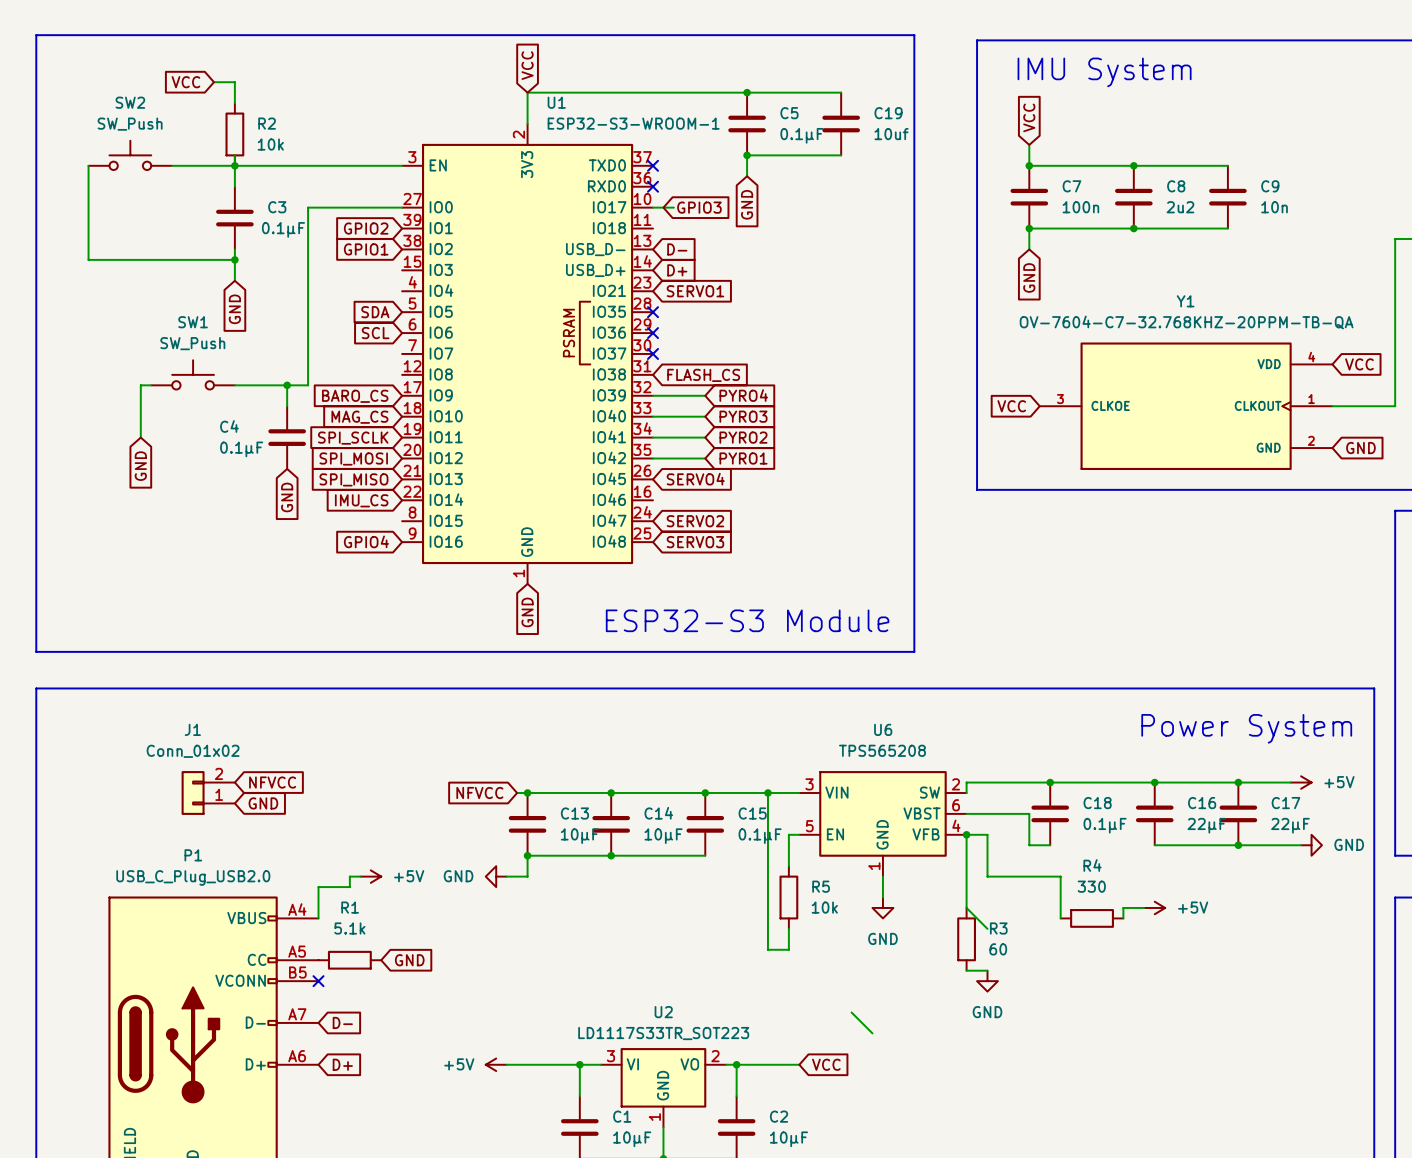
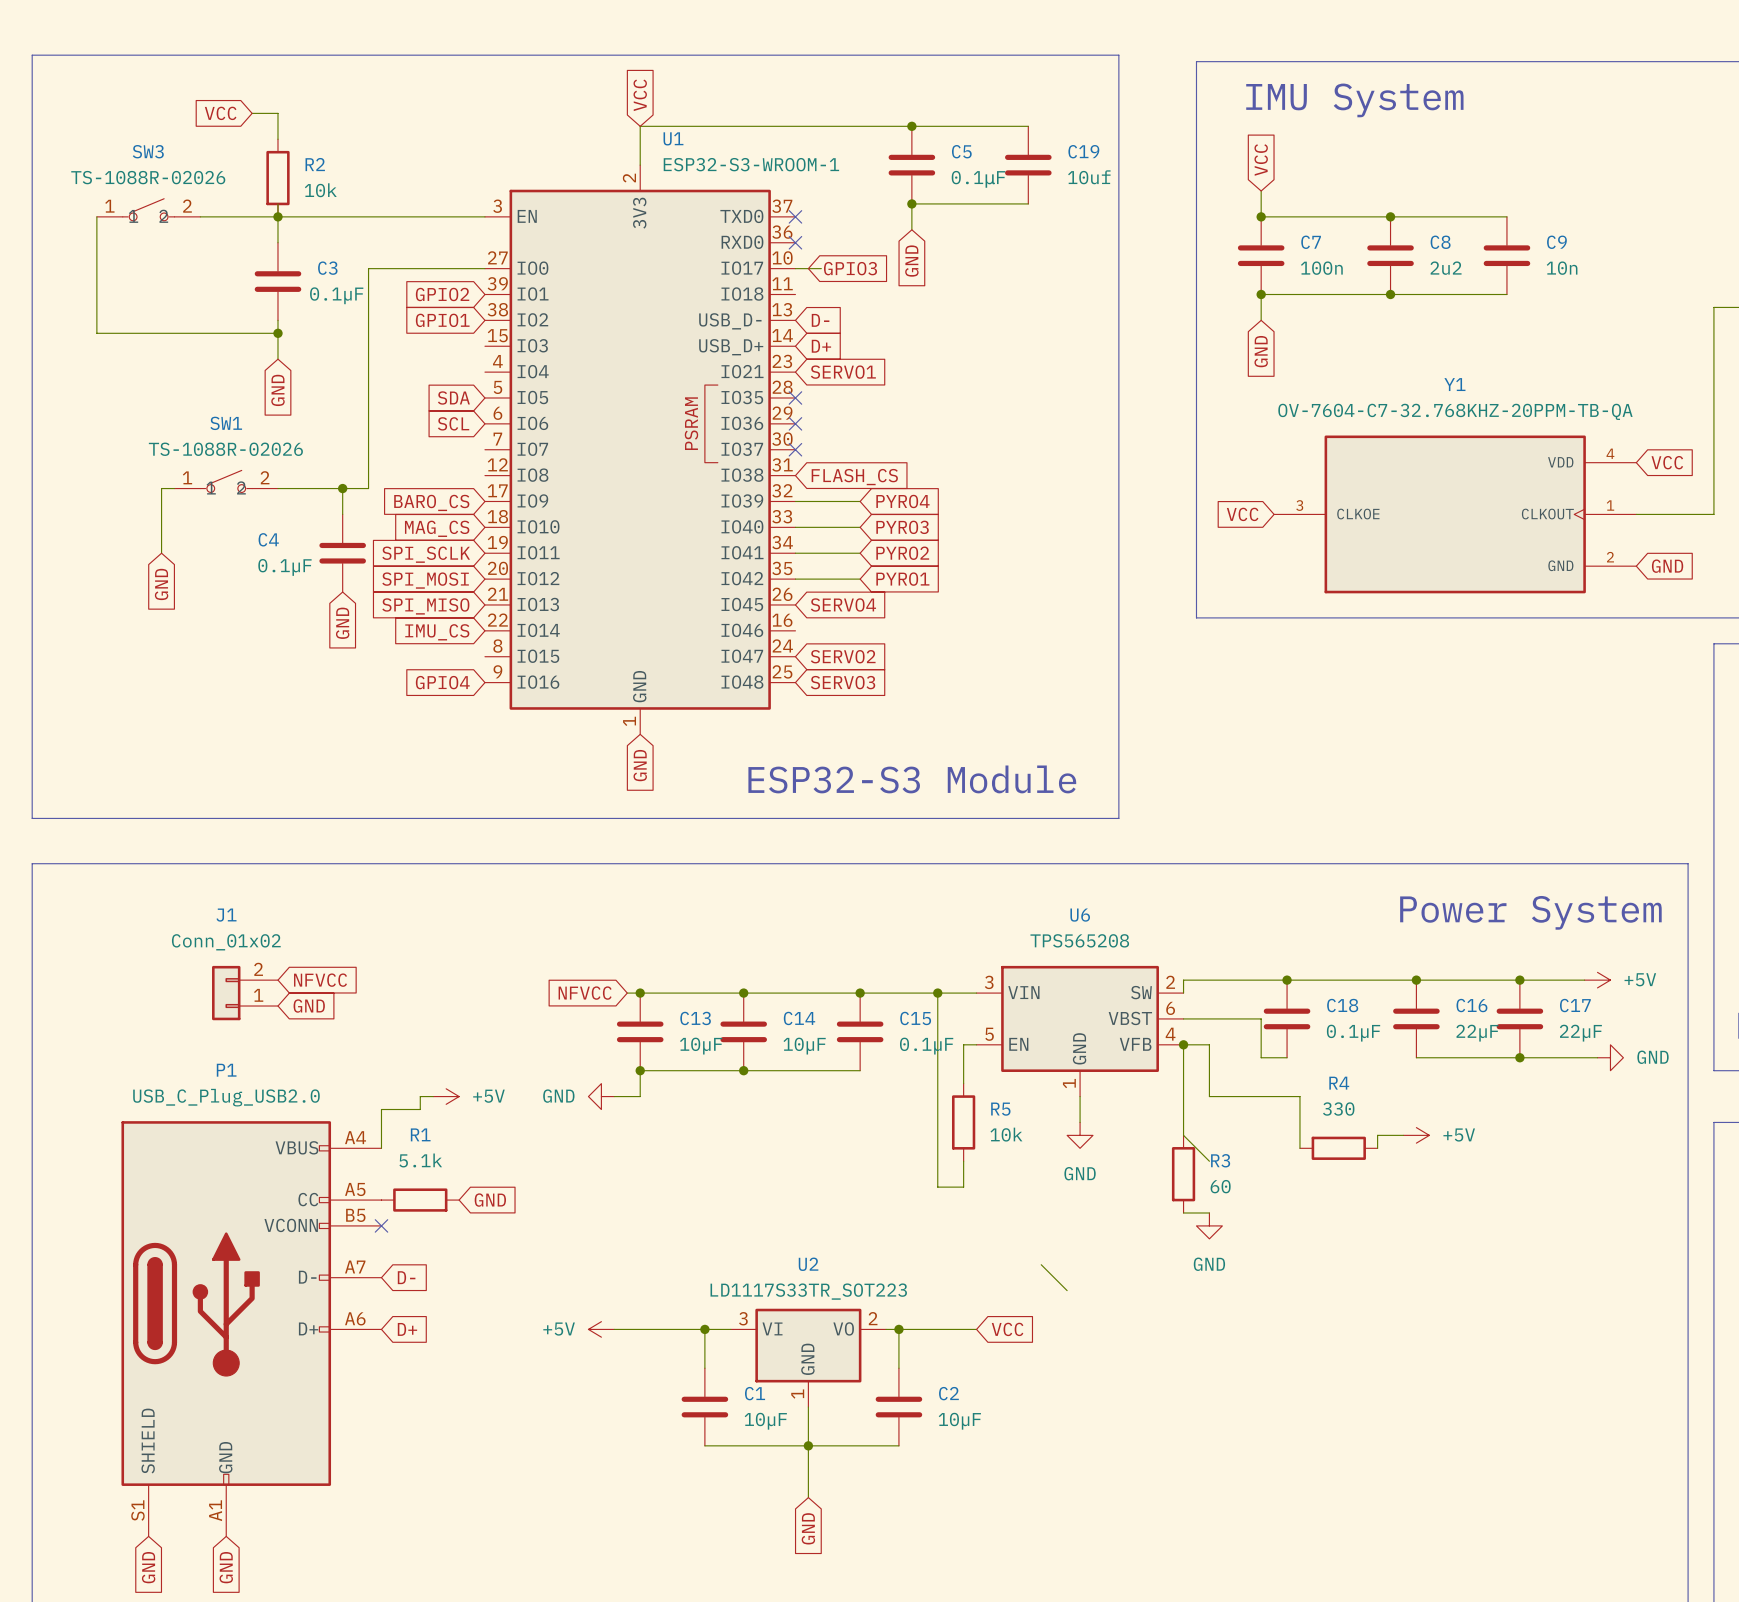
SW2: SW_Push (130, 155) -> none
SW3: none -> TS-1088R-02026 (148, 209)
SW1 value: SW_Push (192, 343) -> TS-1088R-02026 (225, 449)
SW1 symbol: [151, 360, 235, 390] -> [174, 470, 278, 493]

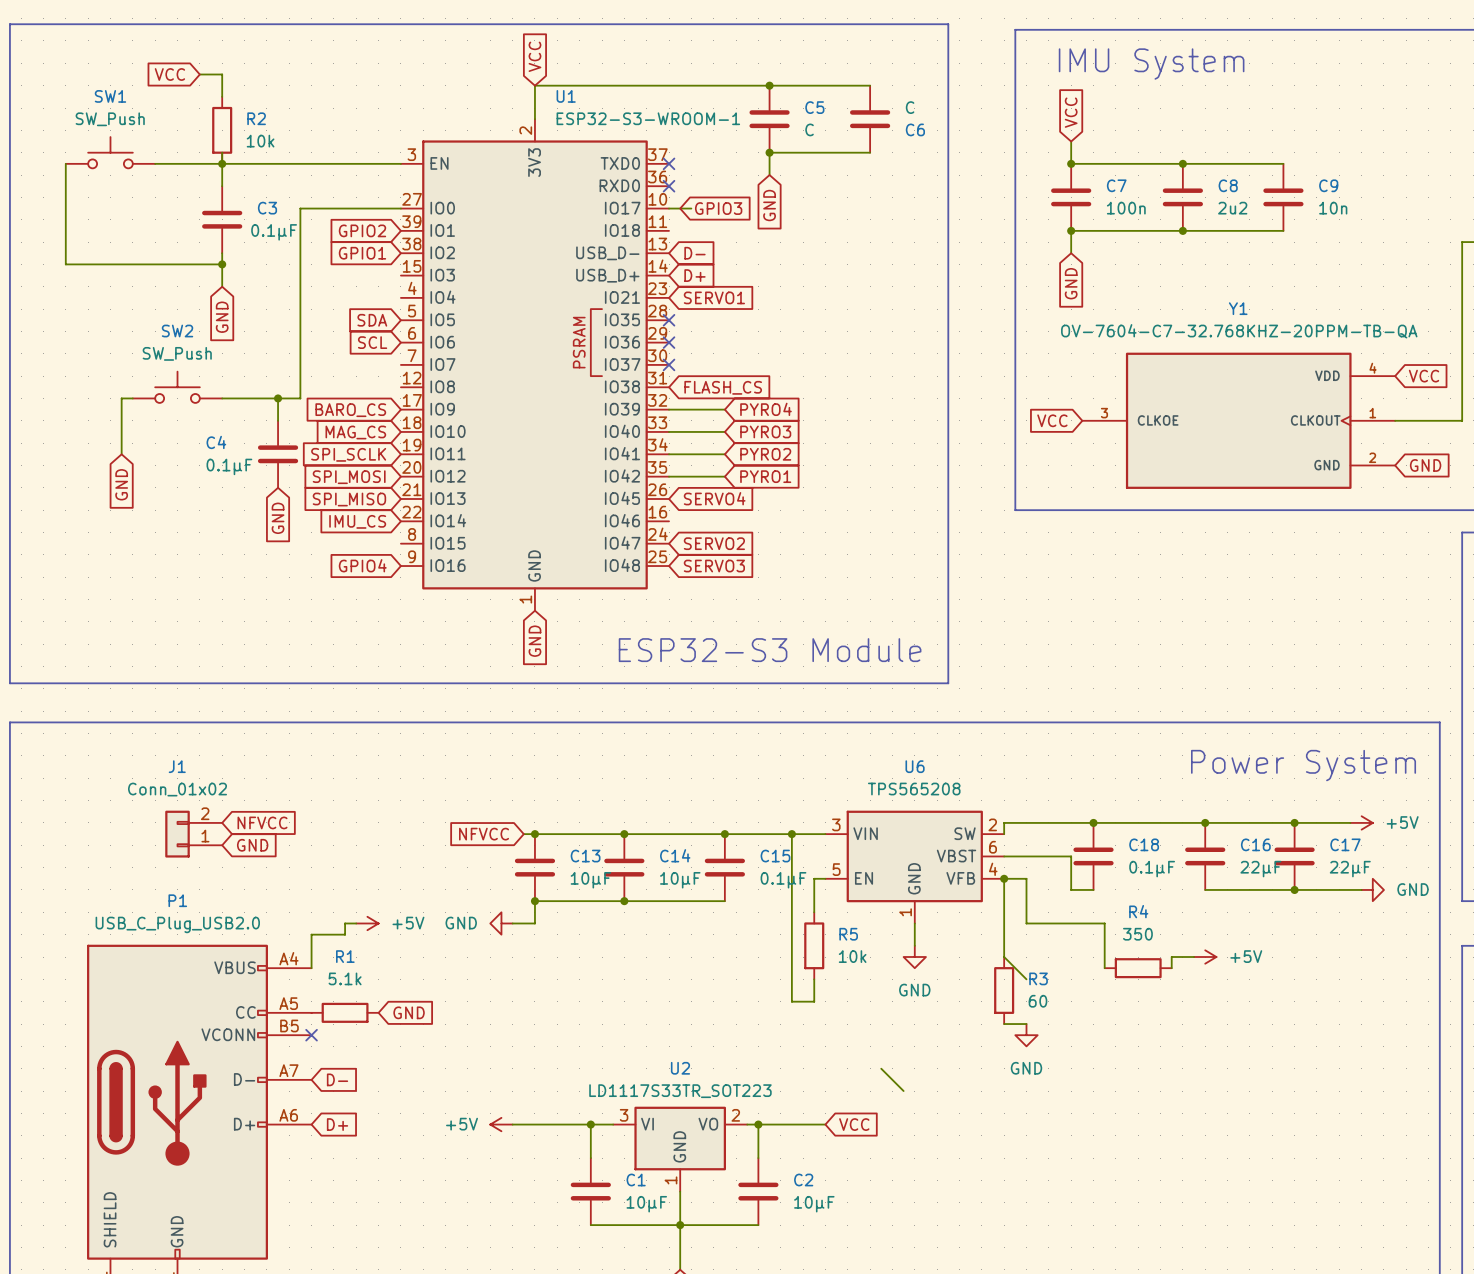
C19 name: C19 (1083, 151) -> C6 (915, 129)
C19 value: 10uf (1089, 177) -> C (910, 107)
C5 value: 0.1μF (978, 179) -> C (809, 129)
SW3: TS-1088R-02026 (148, 209) -> none
SW1 value: TS-1088R-02026 (225, 449) -> SW_Push (110, 119)
SW1 symbol: [174, 470, 278, 493] -> [65, 137, 156, 169]
SW2: none -> SW_Push (177, 387)
R4 value: 330 (1338, 1109) -> 350 (1137, 934)

